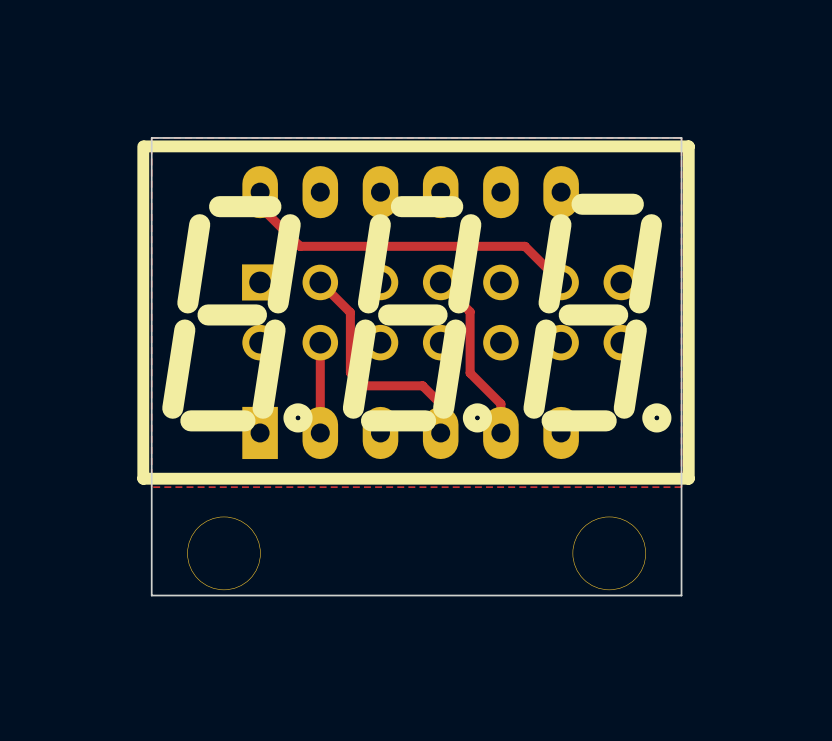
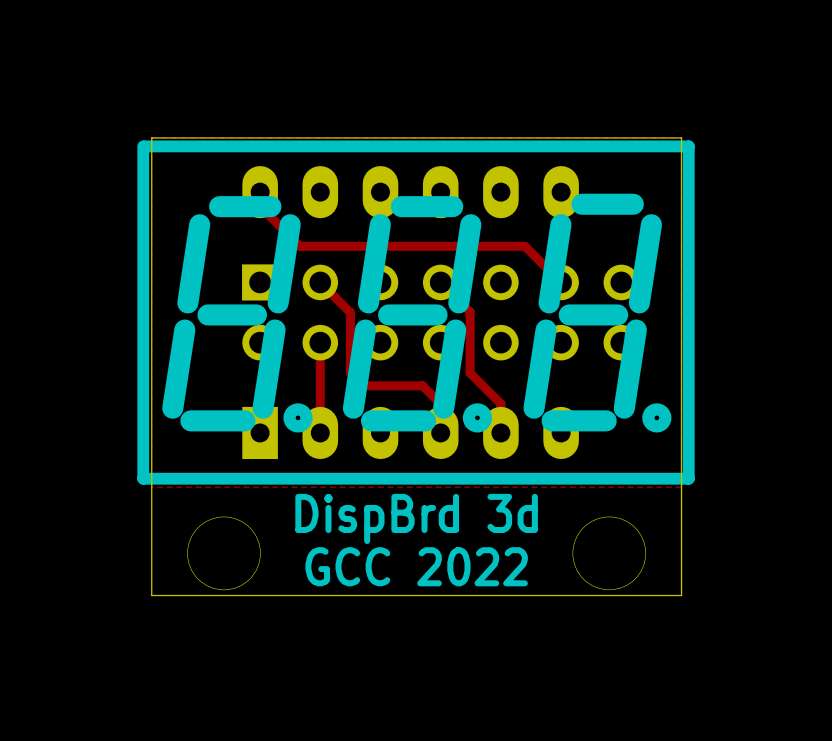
text: none -> DispBrd 3d (416, 518)
text: none -> GCC 2022 (416, 566)

